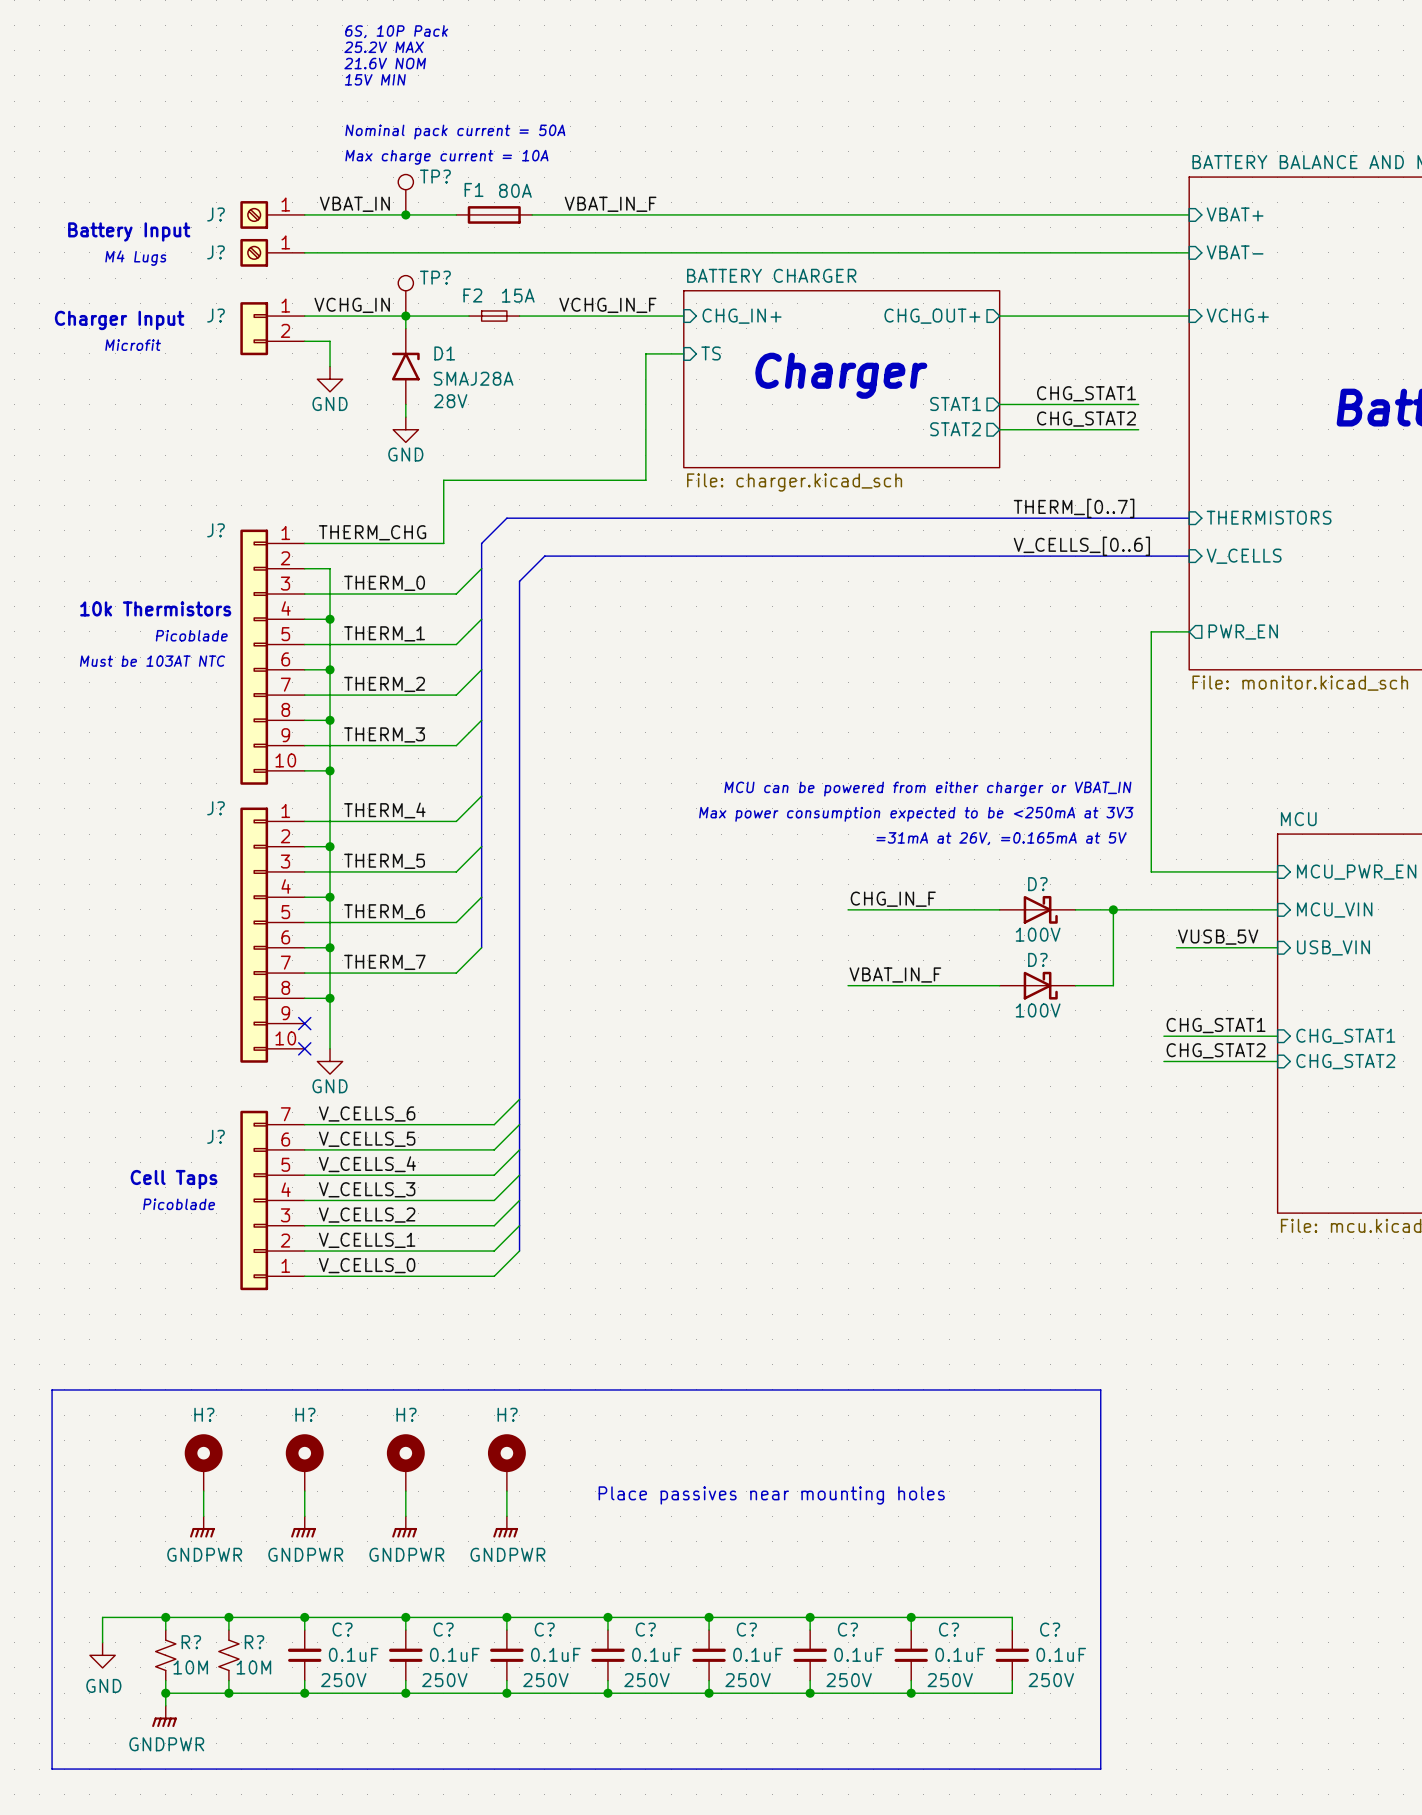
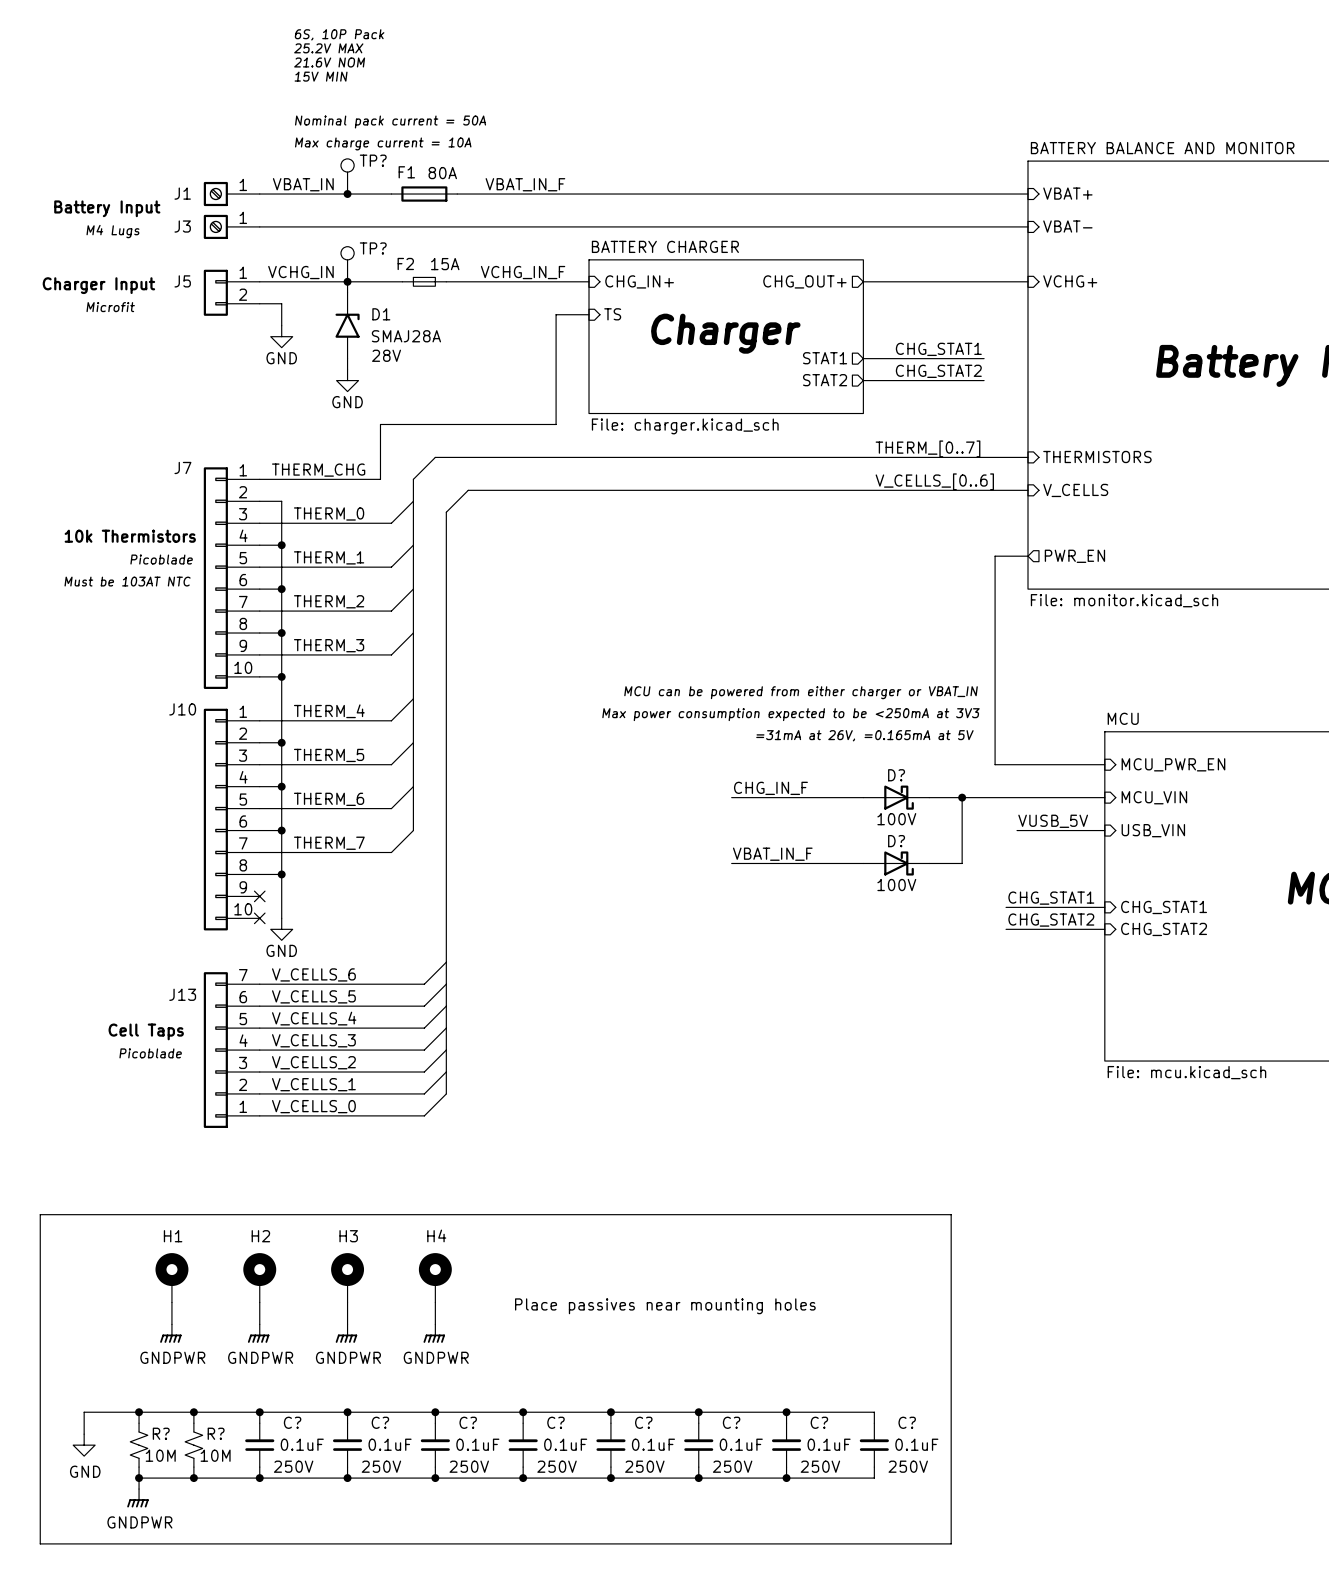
J? name: J? (216, 214) -> J1 (182, 193)
J? name: J? (216, 252) -> J3 (182, 226)
J? name: J? (216, 315) -> J5 (182, 281)
J? name: J? (216, 530) -> J7 (182, 467)
J? name: J? (216, 808) -> J10 (182, 709)
J? name: J? (216, 1136) -> J13 (182, 994)
H? name: H? (204, 1414) -> H1 (173, 1236)
H? name: H? (305, 1414) -> H2 (260, 1236)
H? name: H? (406, 1414) -> H3 (348, 1236)
H? name: H? (507, 1414) -> H4 (436, 1235)

